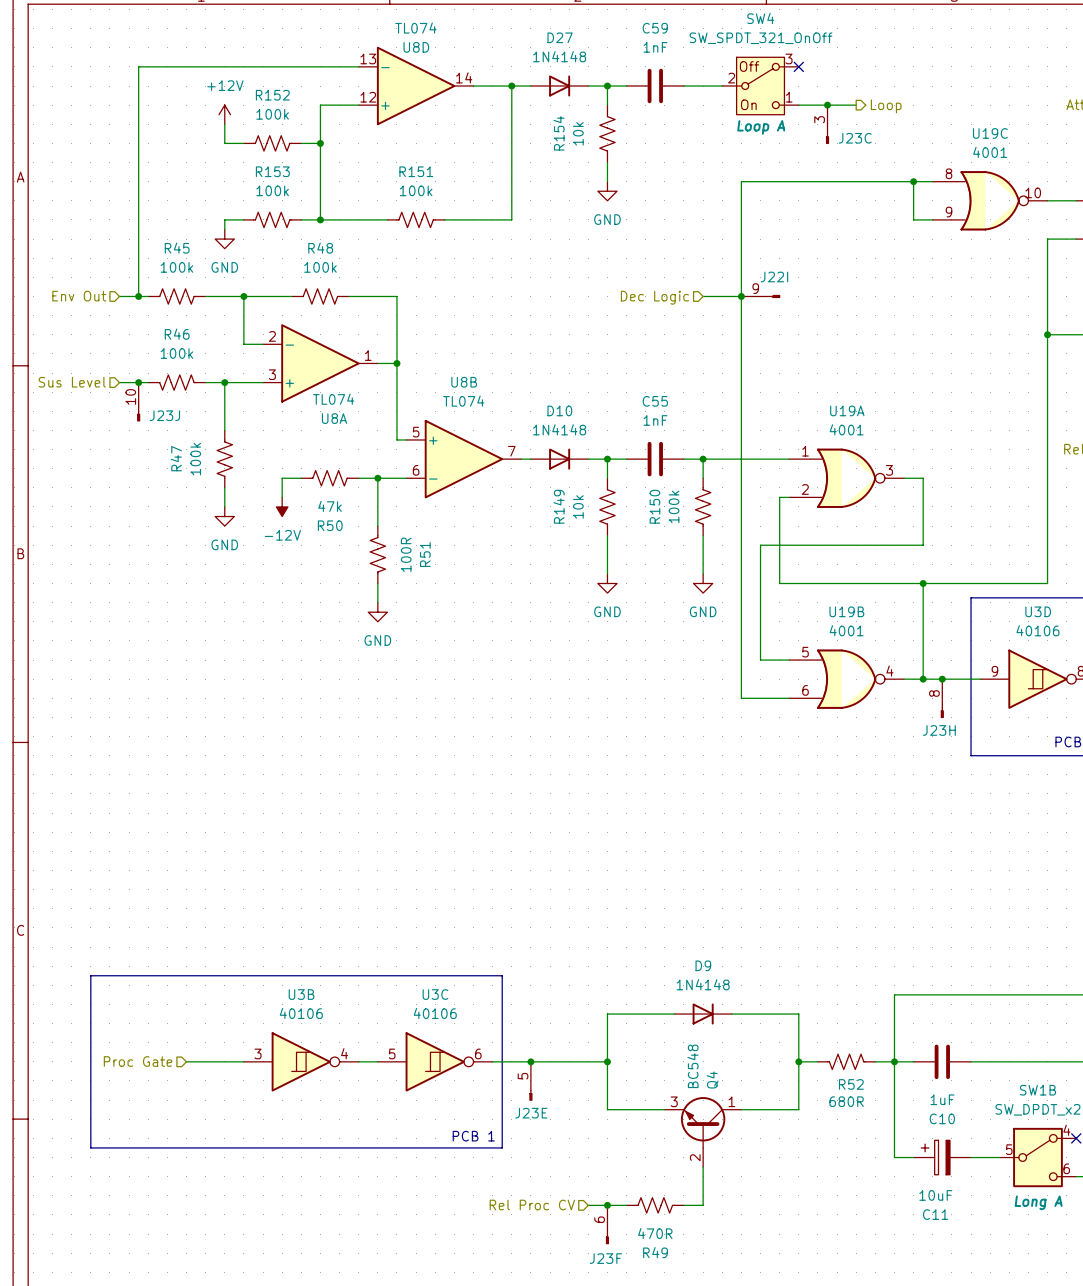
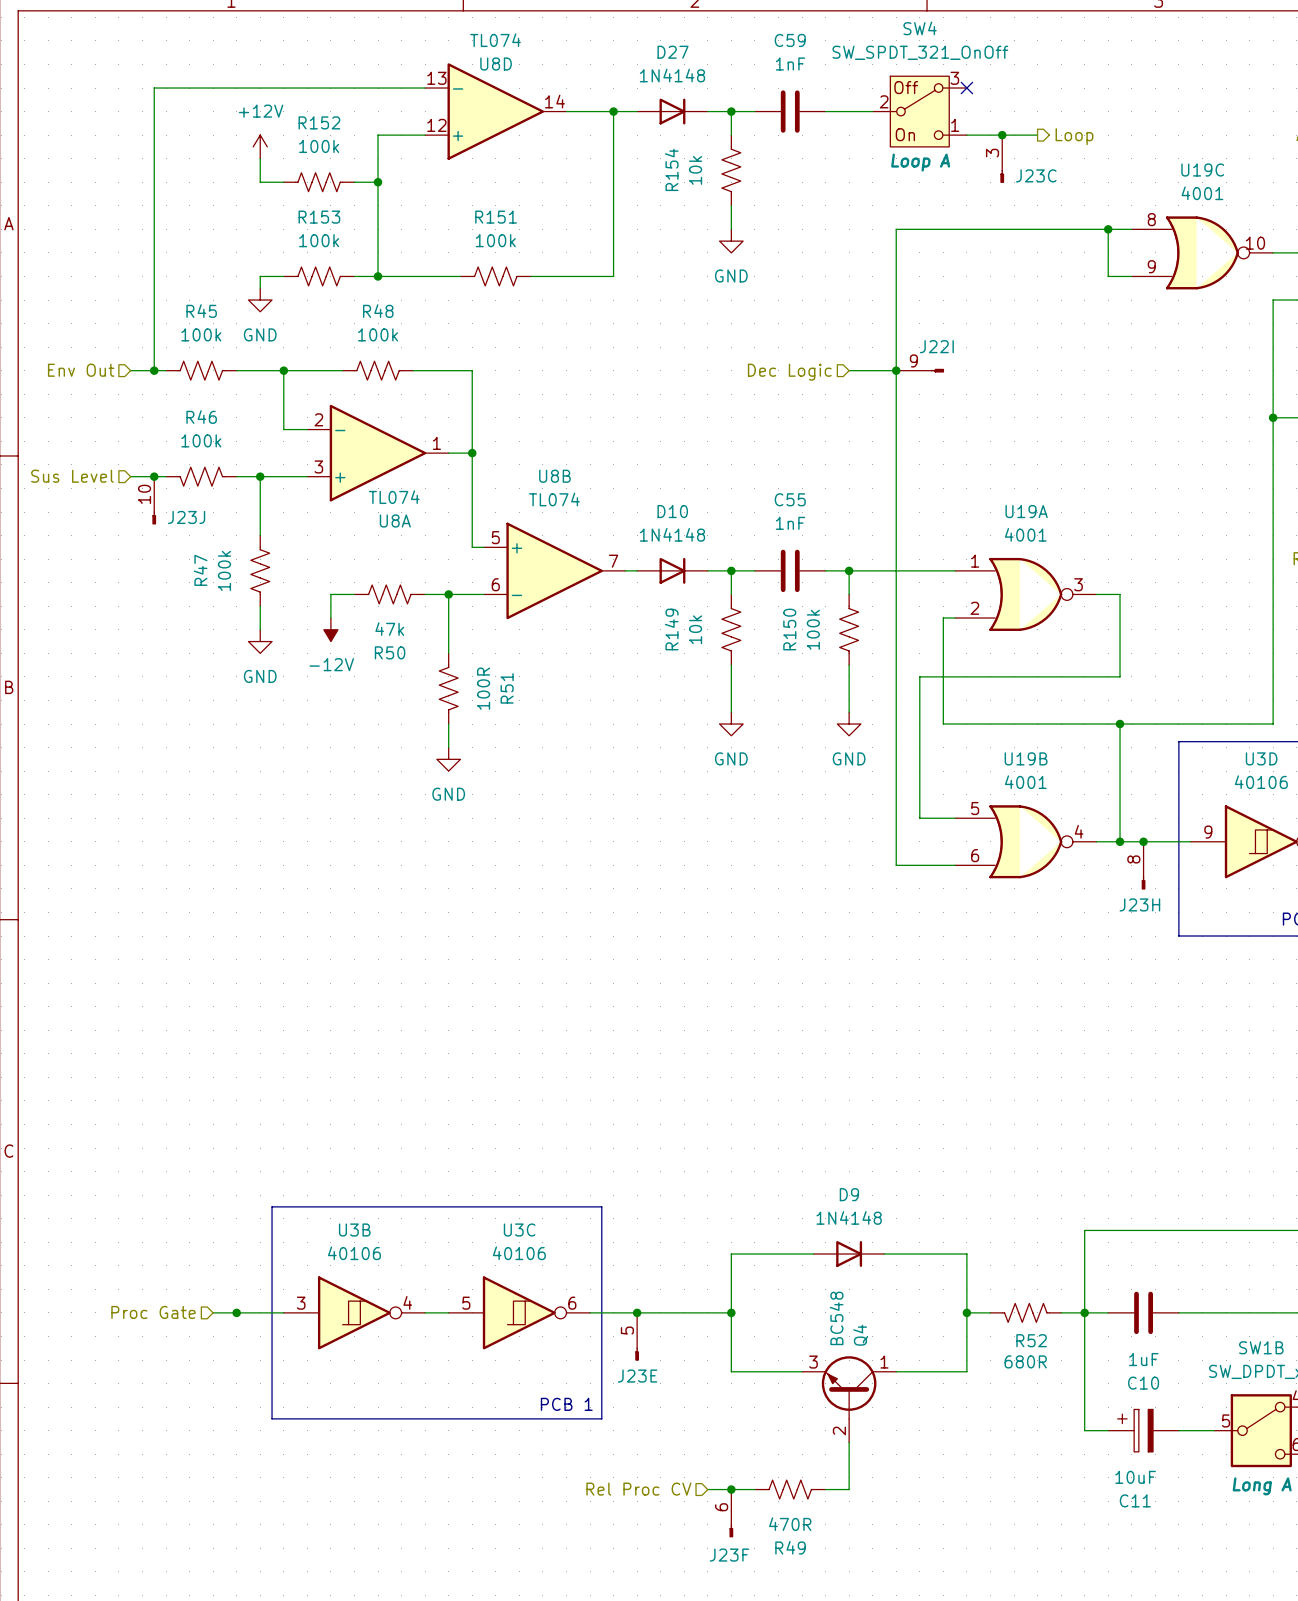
line: (234, 975) (90, 975) (90, 1147) (234, 1147) -> (272, 1206) (272, 1418)
junction: none -> (236, 1312)

